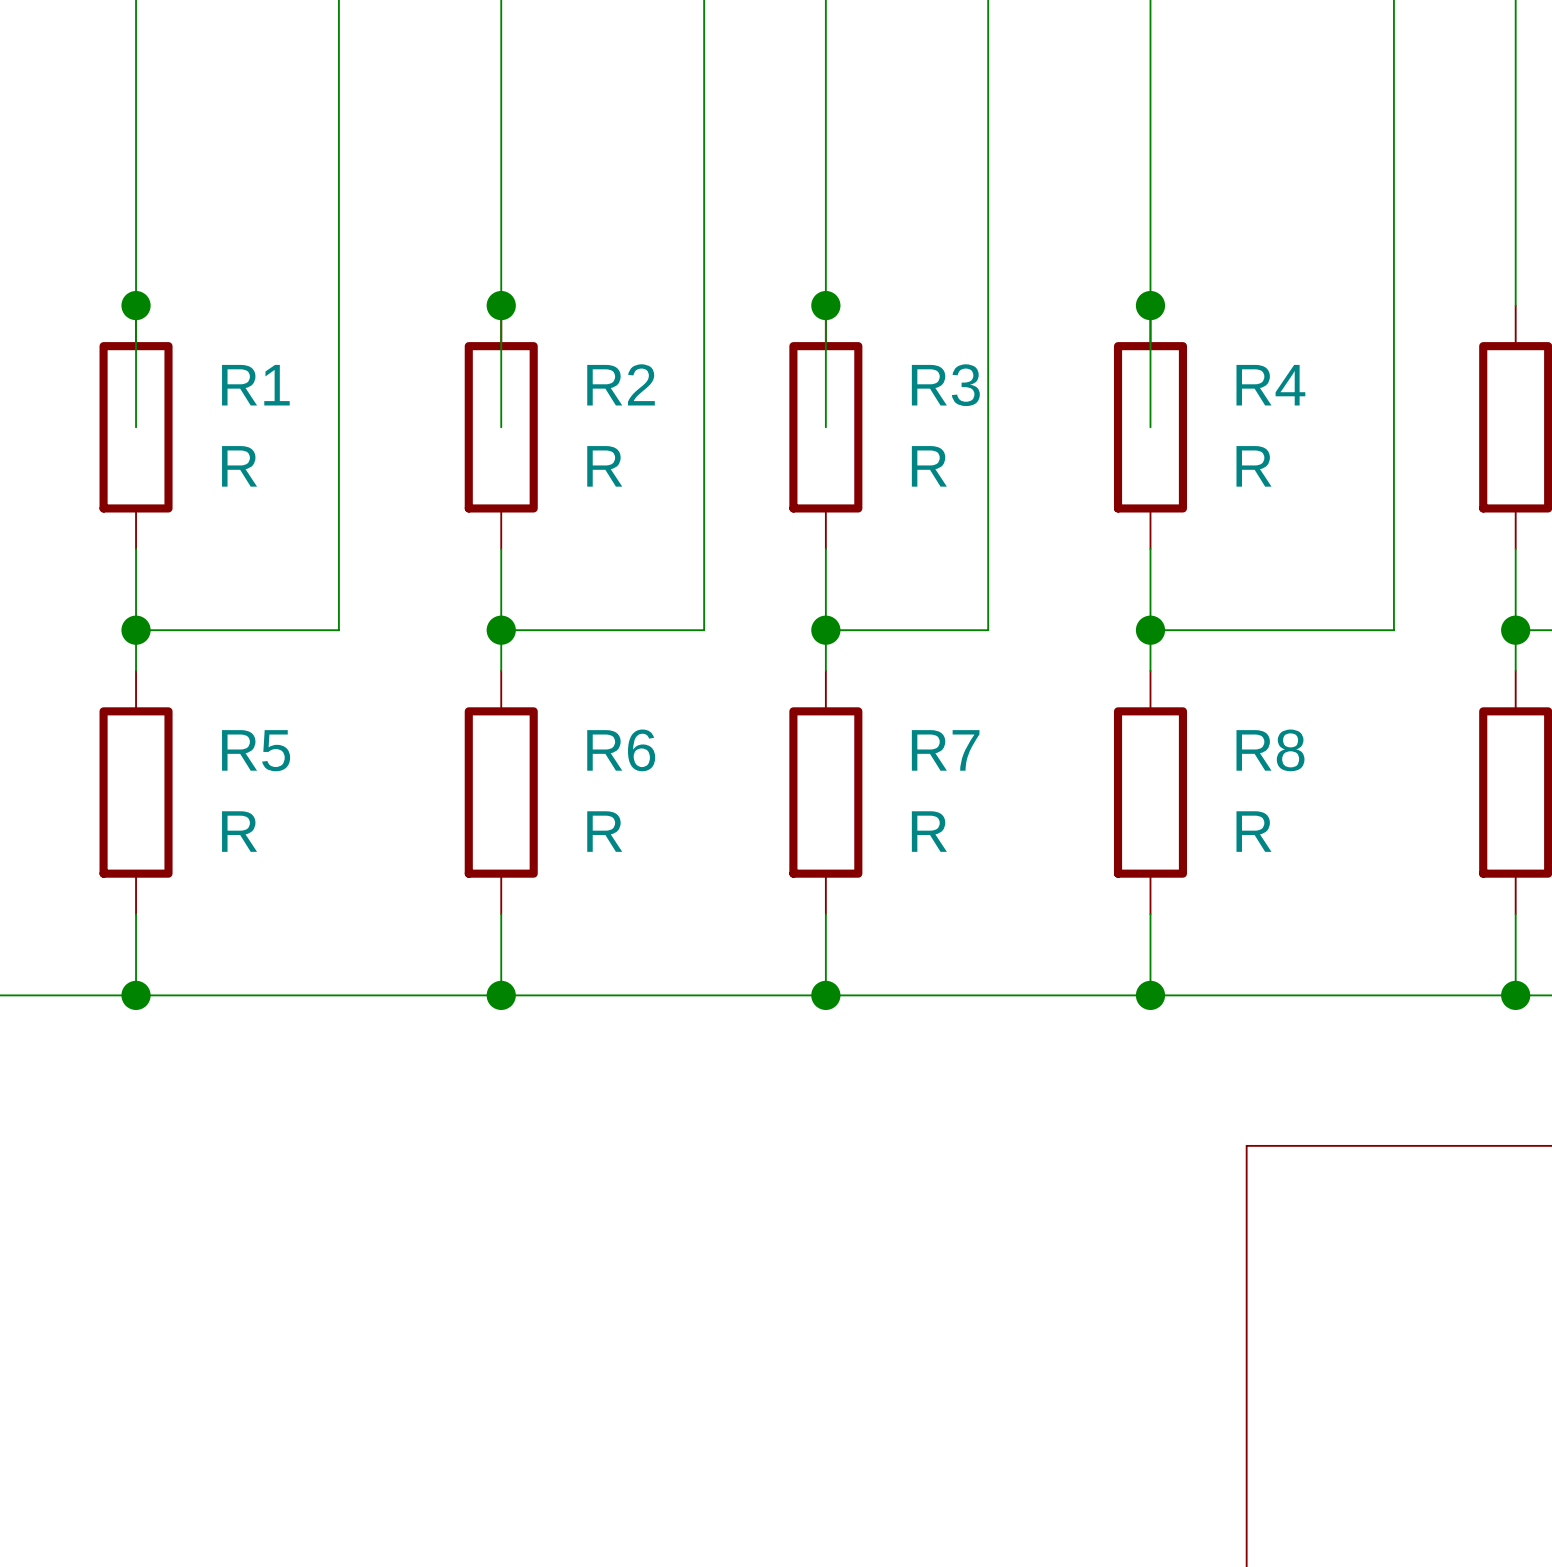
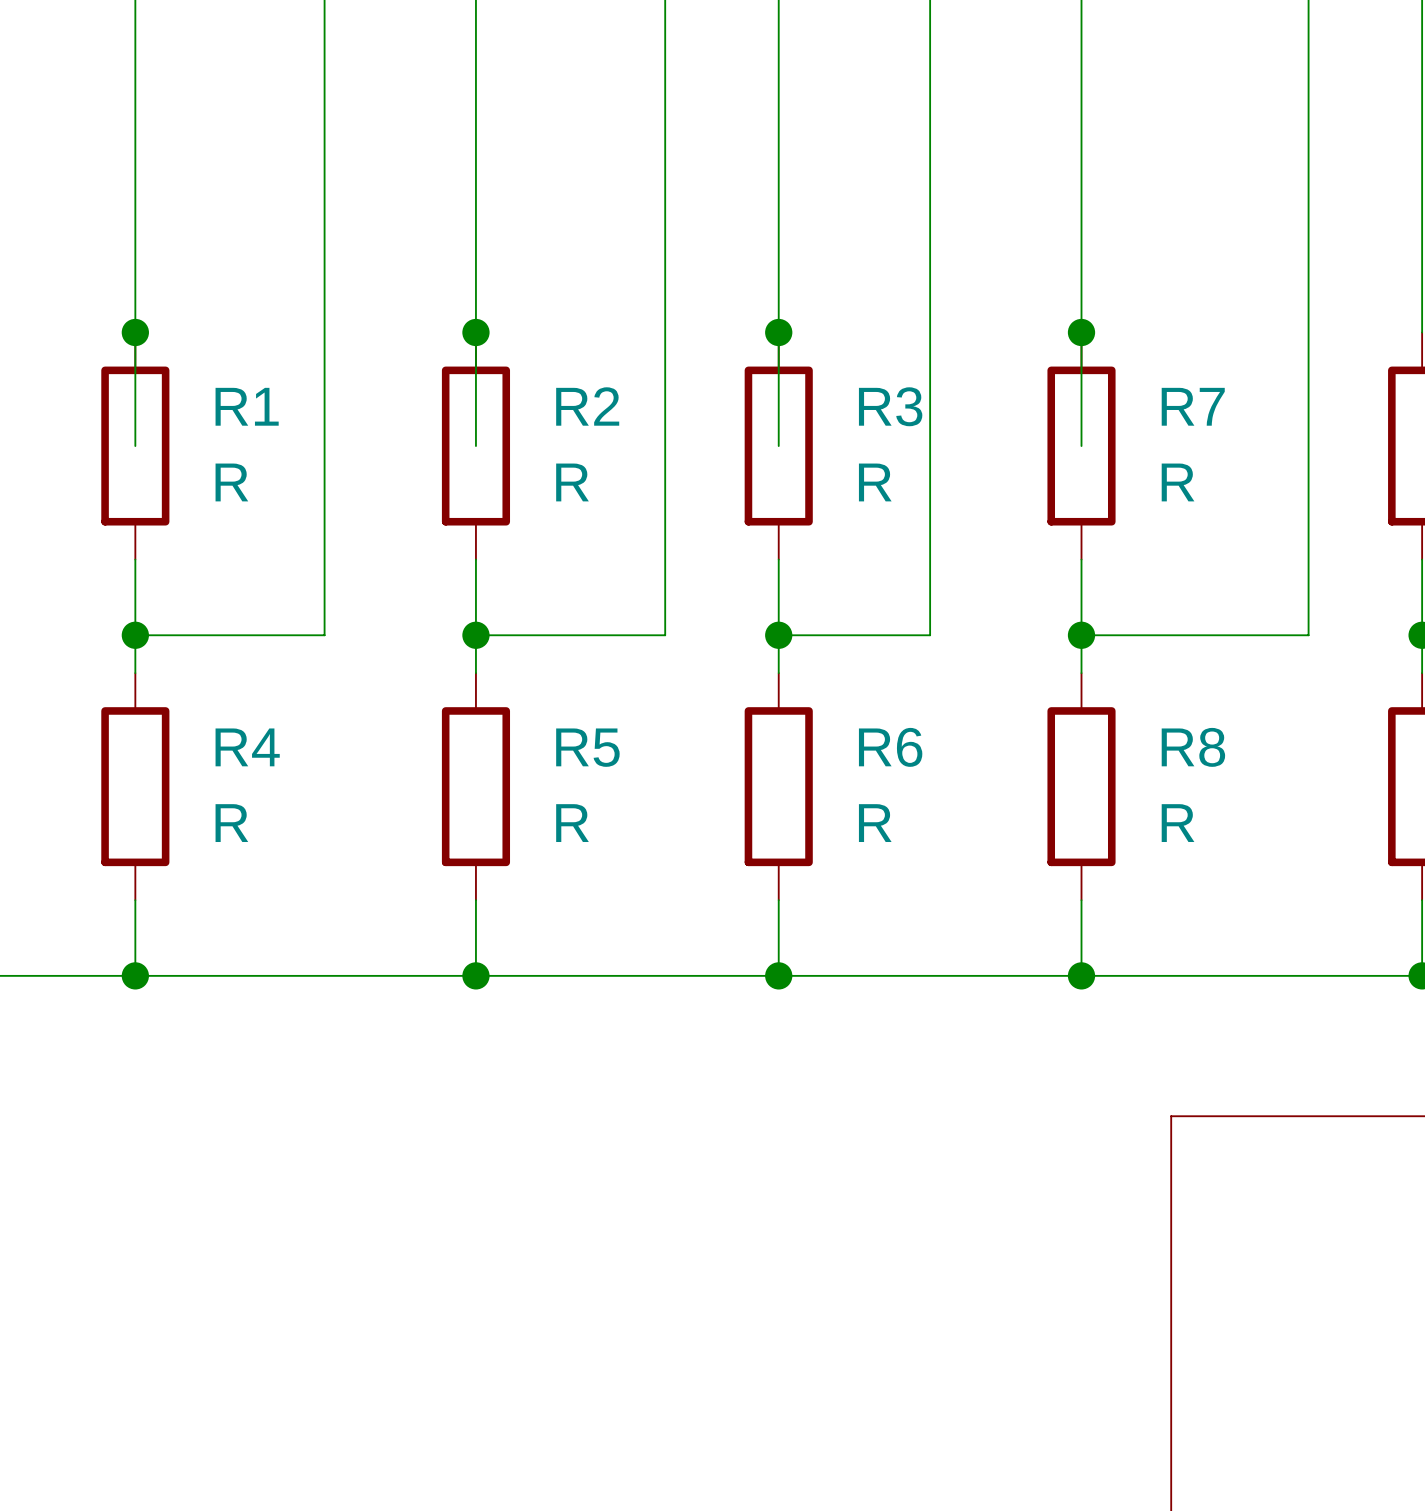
R4 name: R4 (1270, 385) -> R7 (1193, 406)
R5 name: R5 (256, 750) -> R4 (247, 747)
R6 name: R6 (621, 750) -> R5 (587, 747)
R7 name: R7 (945, 750) -> R6 (890, 747)

